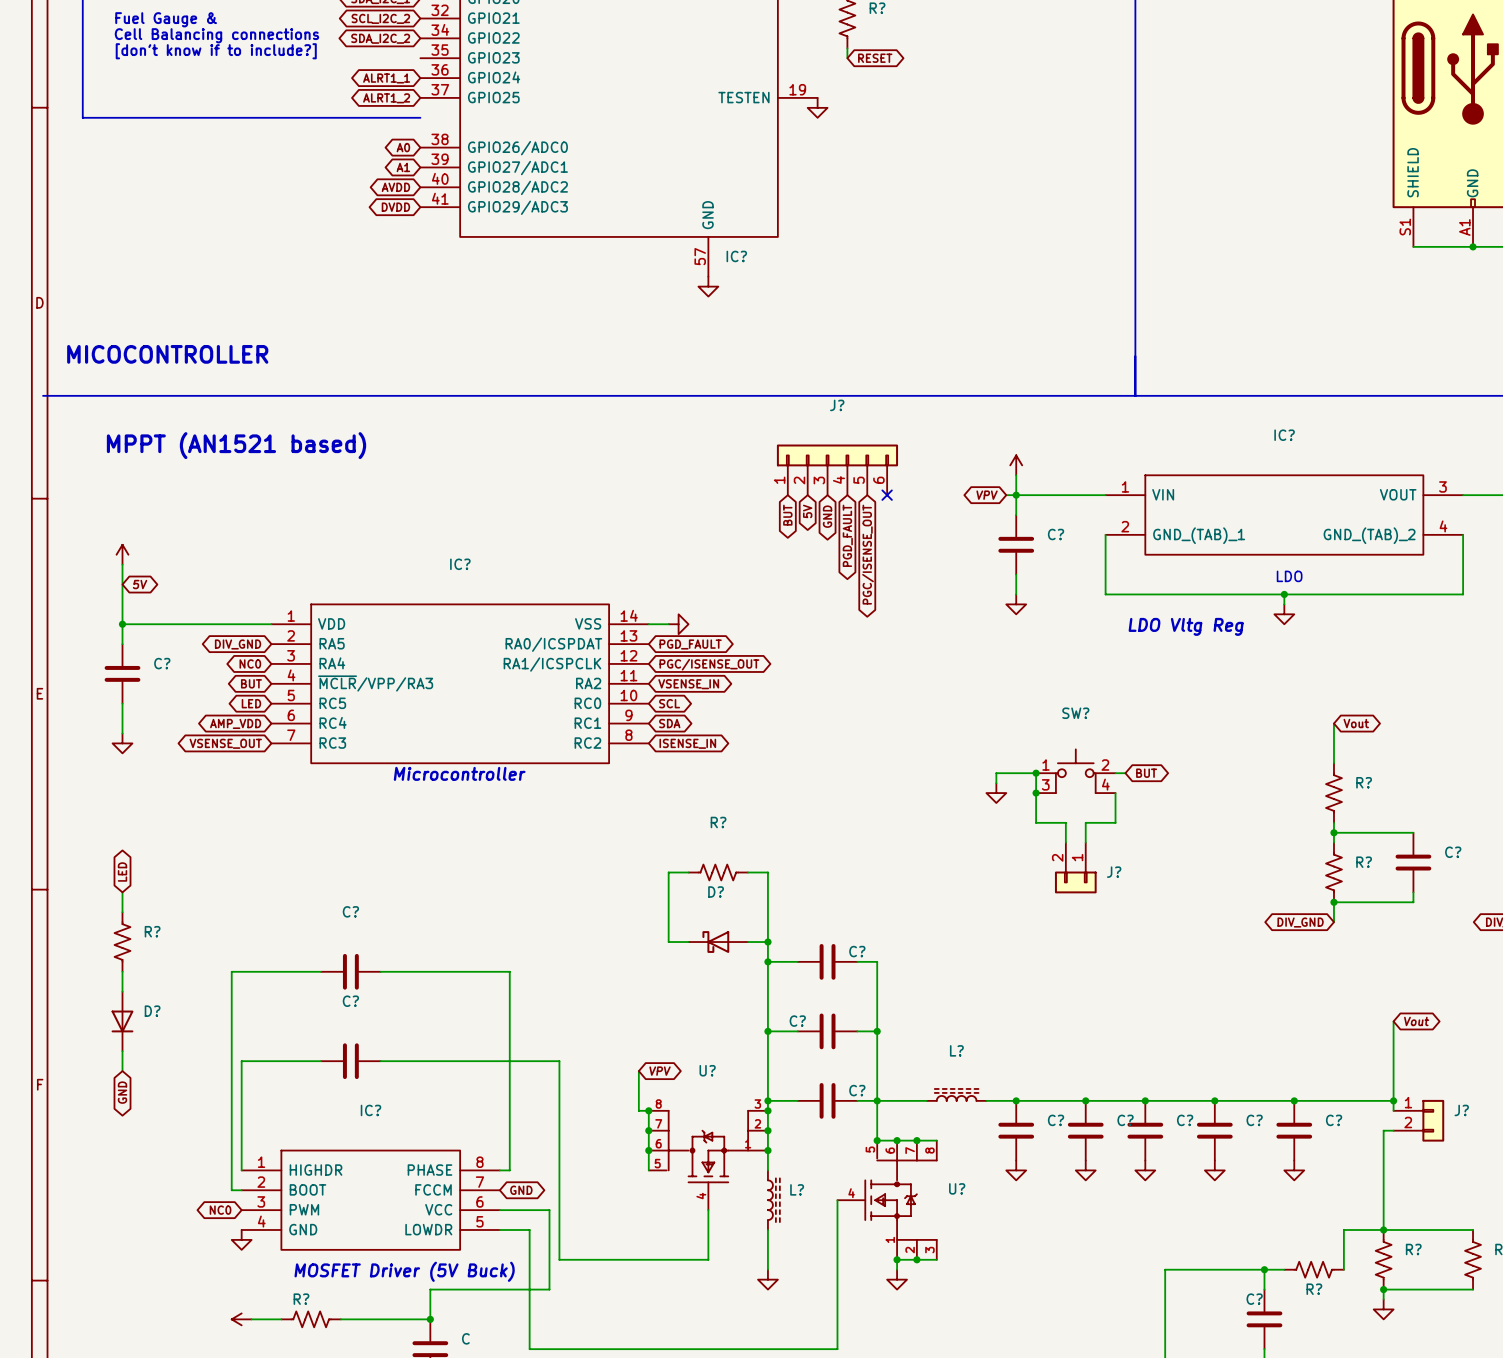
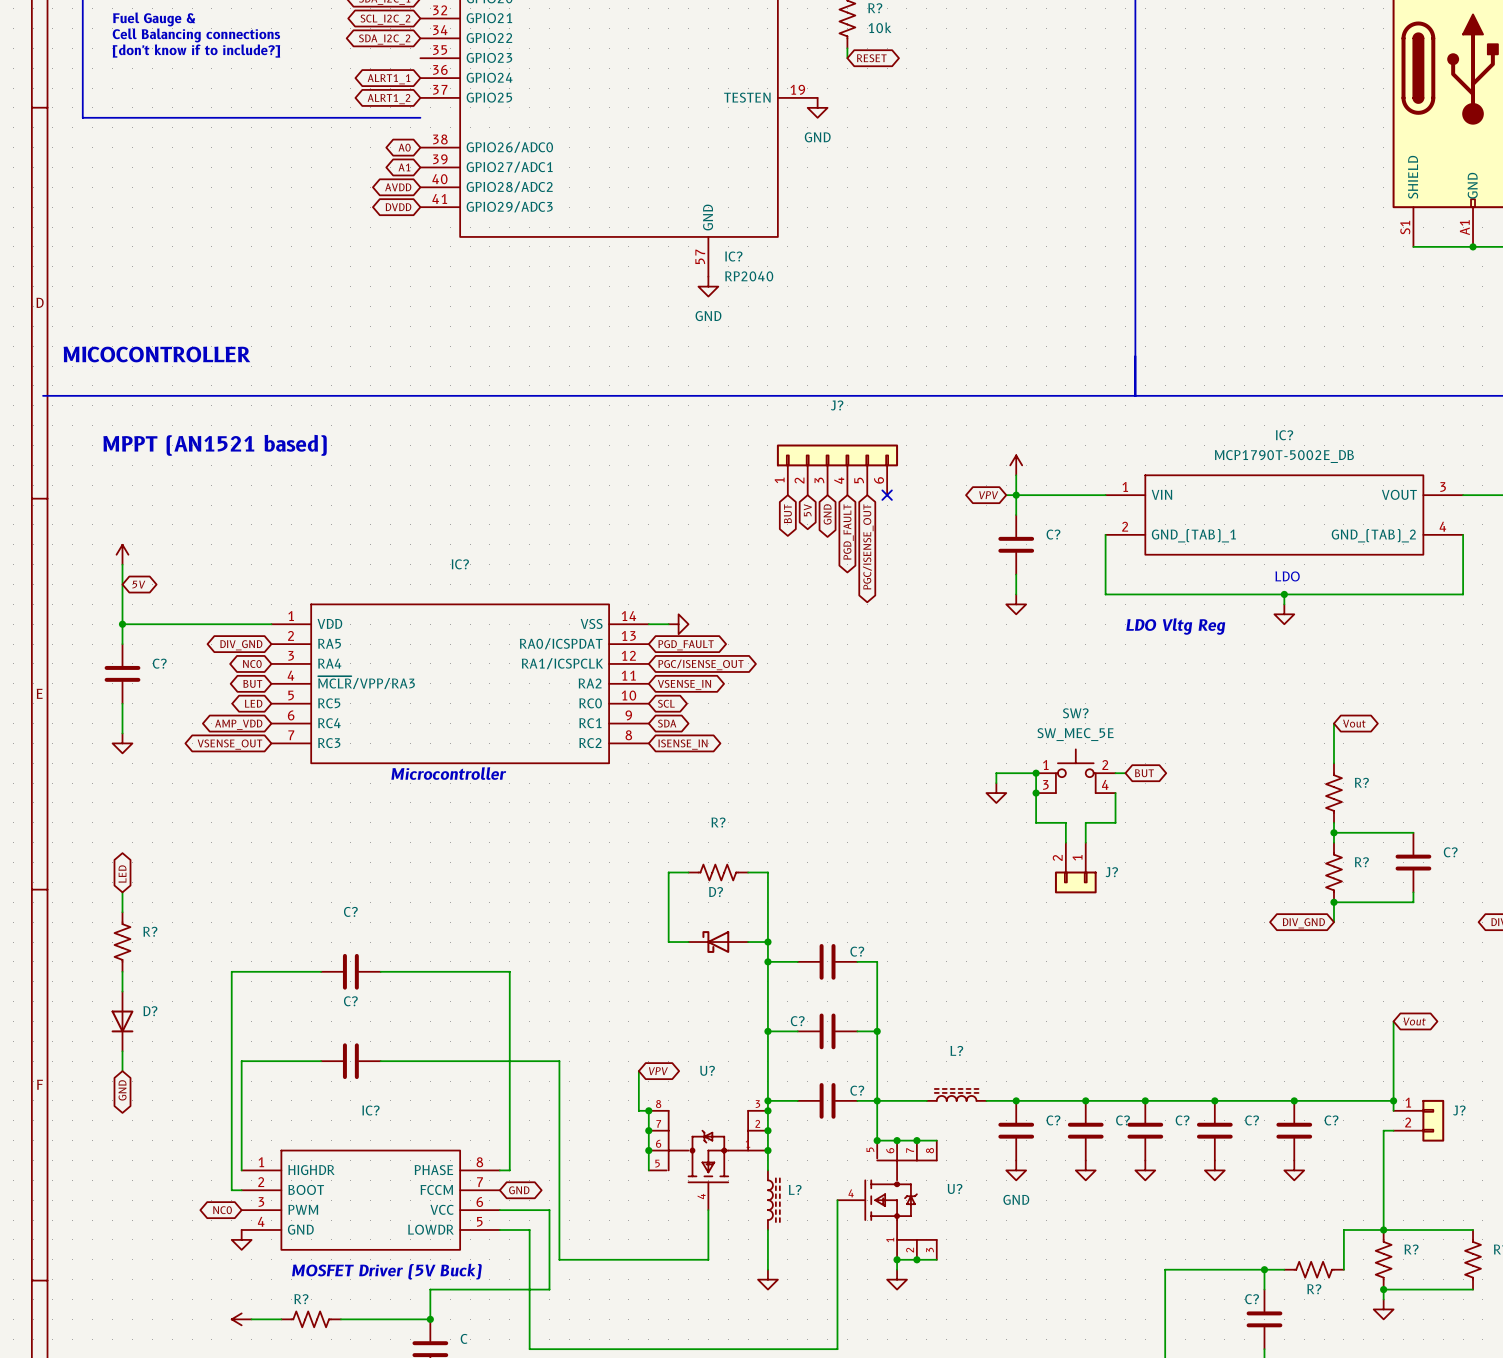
R? value: none -> 10k (880, 27)
power symbol text: none -> GND (817, 137)
IC? value: none -> RP2040 (749, 276)
power symbol text: none -> GND (708, 316)
IC? value: none -> MCP1790T-5002E_DB (1284, 456)
SW? value: none -> SW_MEC_5E (1075, 734)
power symbol text: none -> GND (1016, 1199)

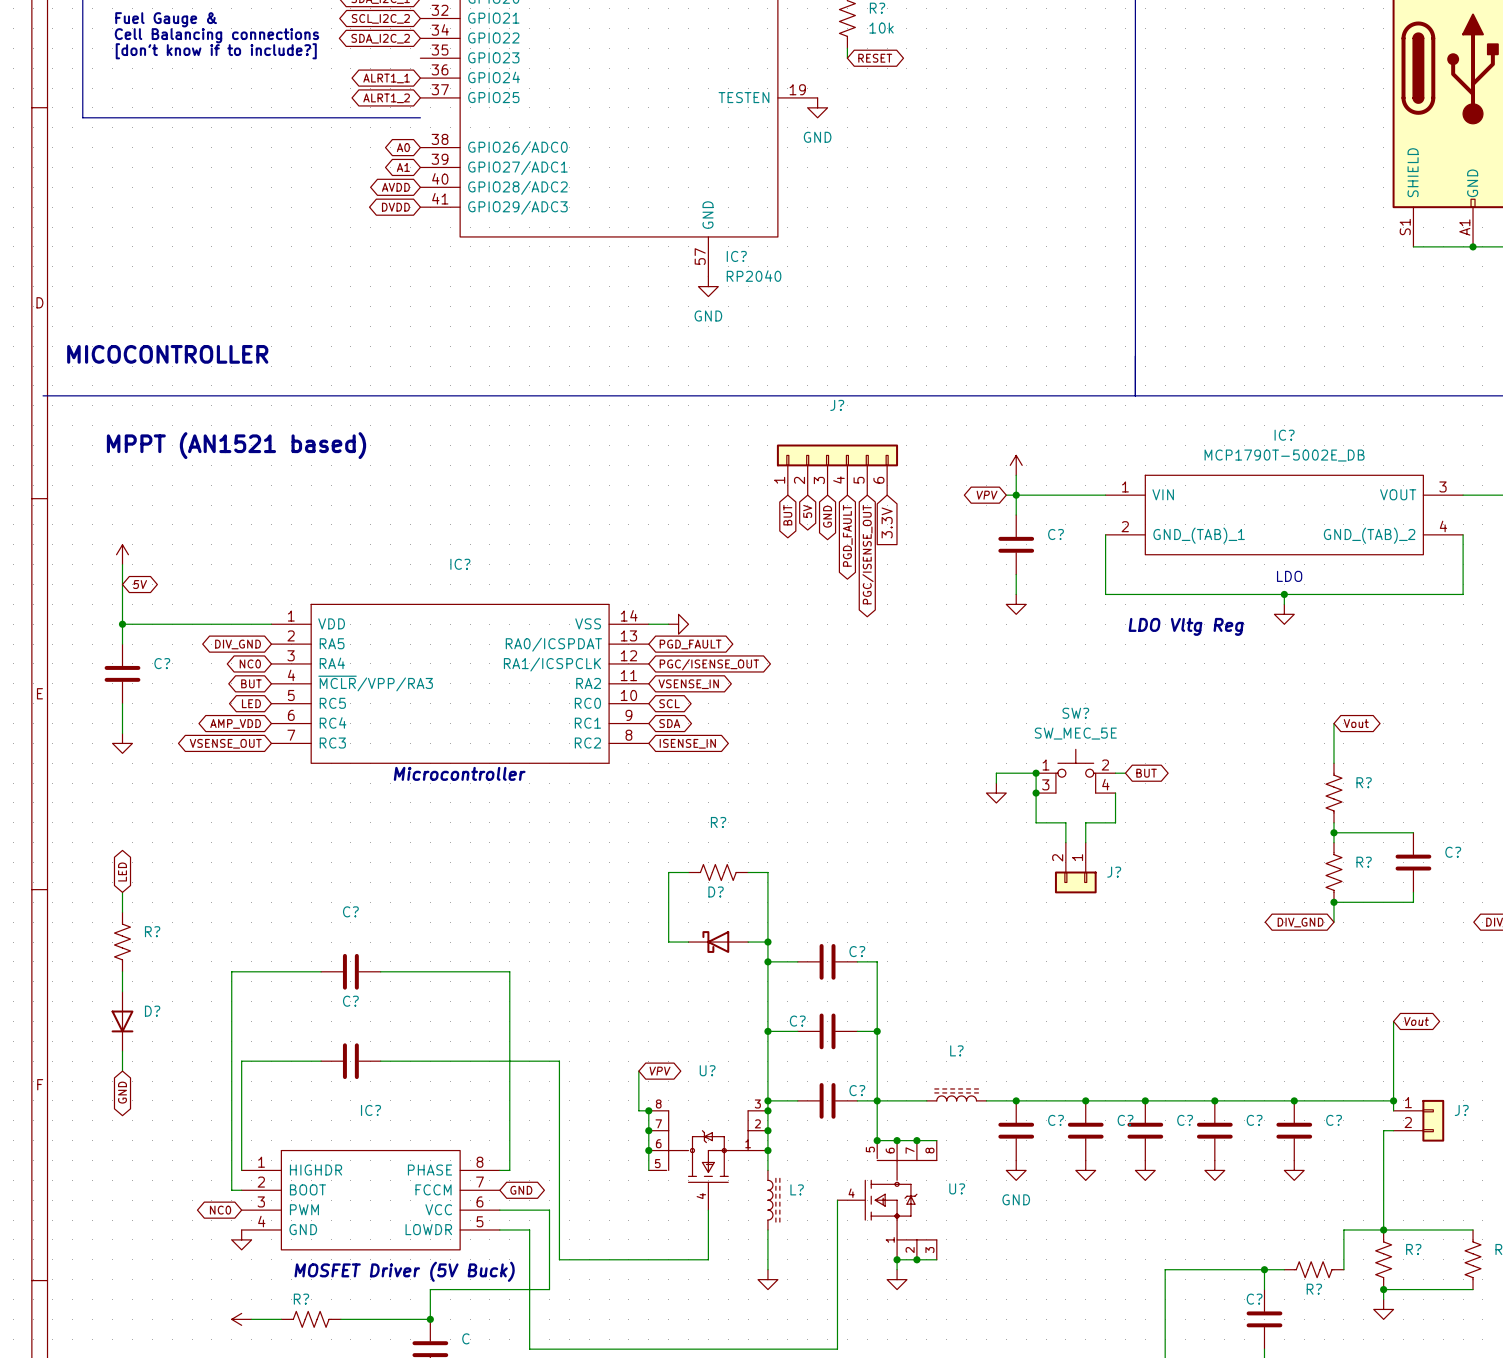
no-connect mark: (887, 495) -> none
global label: none -> 3.3V (887, 522)

